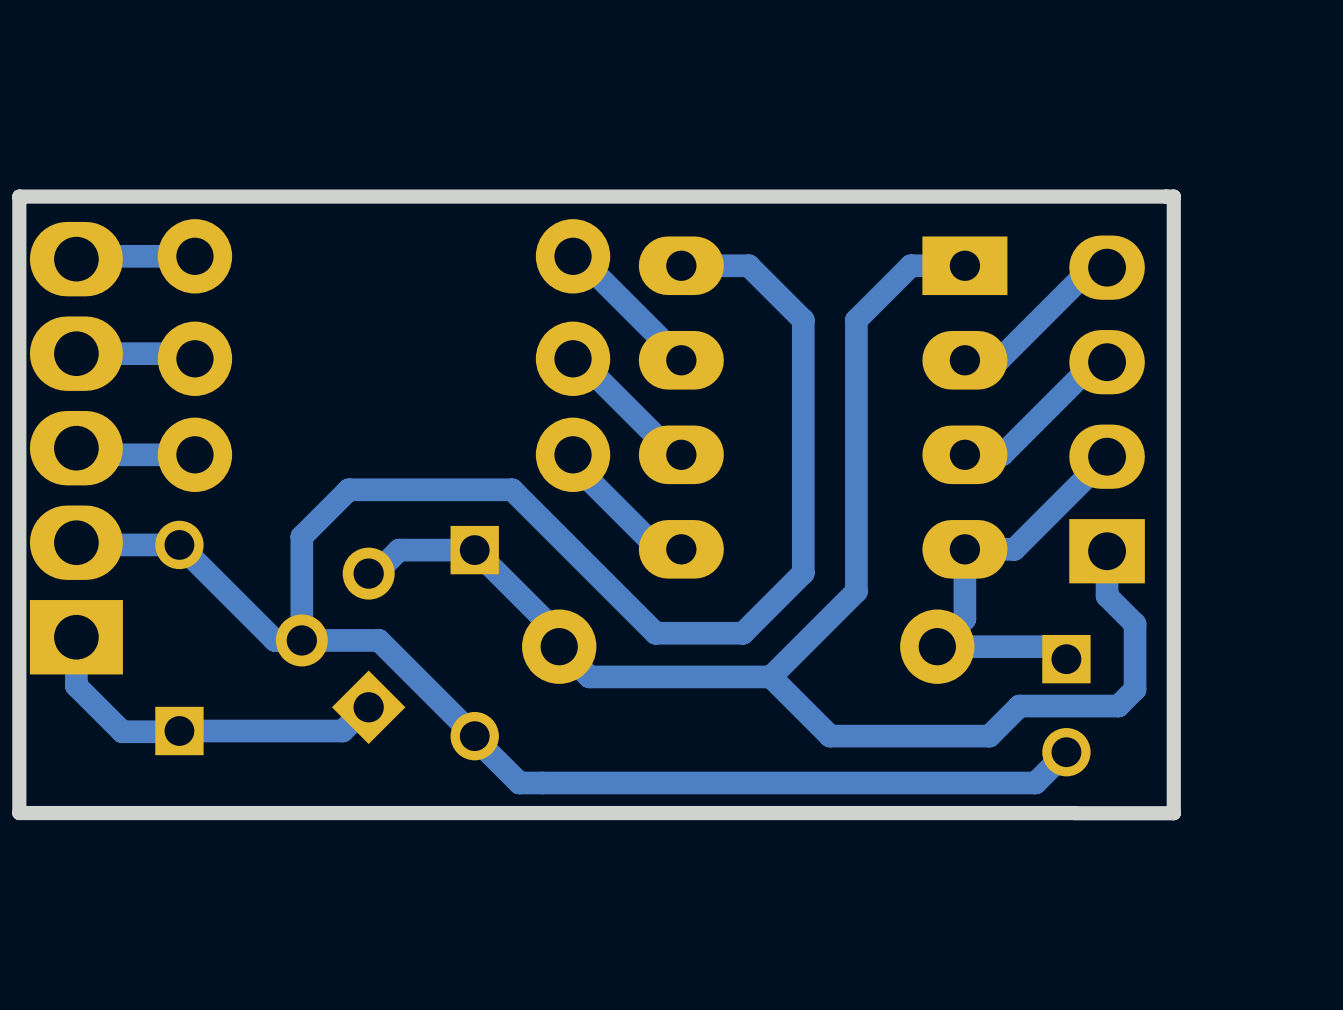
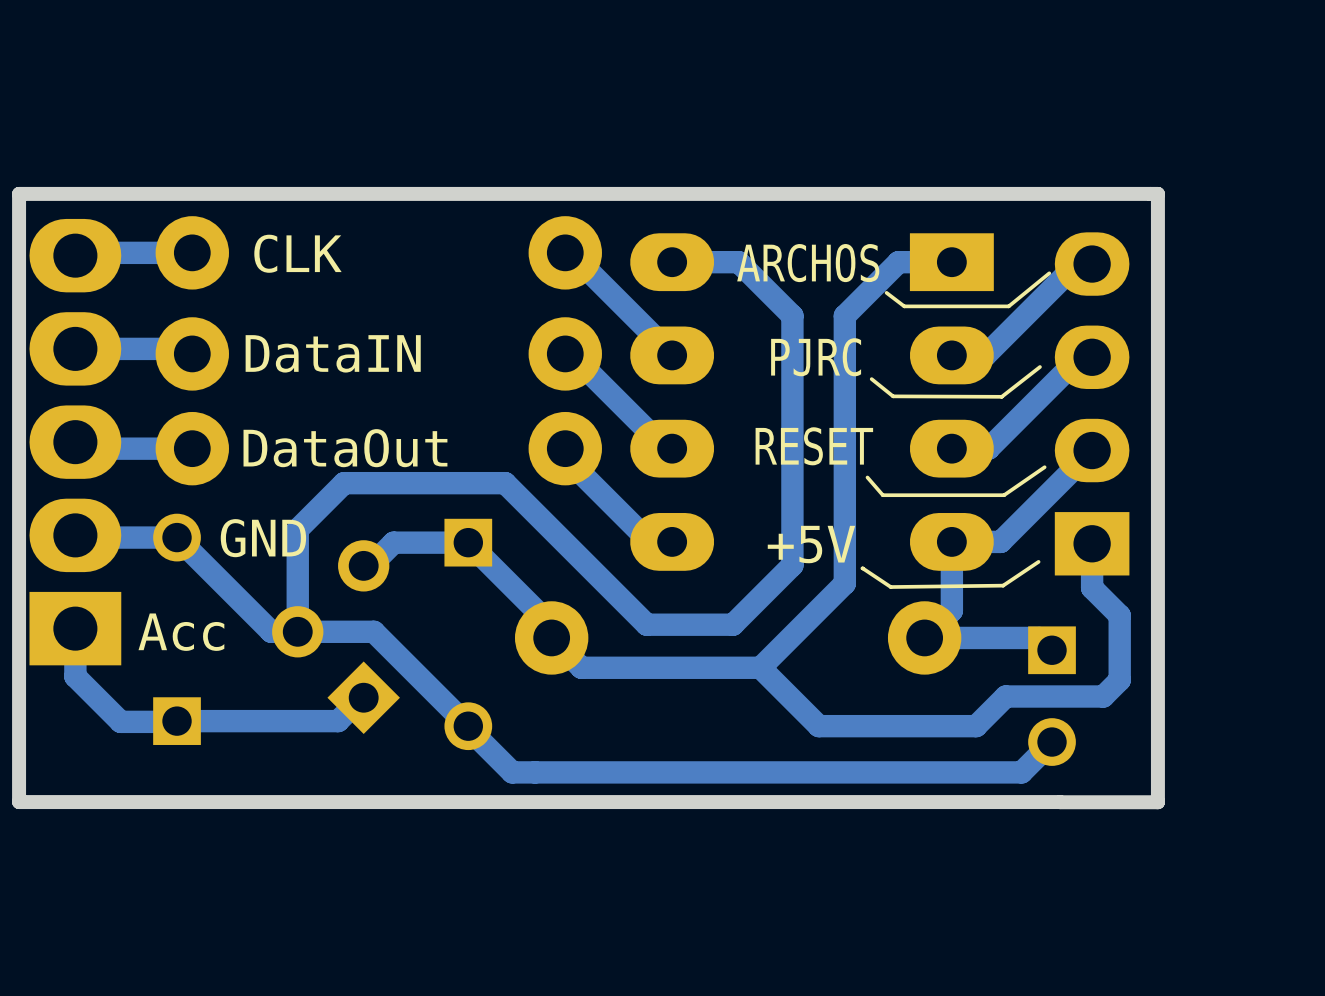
text: none -> CLK (297, 253)
text: none -> ARCHOS (808, 263)
line: none -> (1049, 273) (1008, 306) (904, 306) (886, 292)
text: none -> DataIN (333, 353)
text: none -> PJRC (816, 357)
line: none -> (1039, 366) (1001, 396) (893, 396) (871, 379)
text: none -> RESET (814, 446)
text: none -> DataOut (345, 448)
line: none -> (1044, 467) (1004, 495) (882, 495) (867, 477)
text: none -> GND (263, 538)
text: none -> +5V (811, 544)
line: none -> (1038, 561) (1003, 585) (890, 587) (862, 568)
text: none -> Acc (181, 632)

